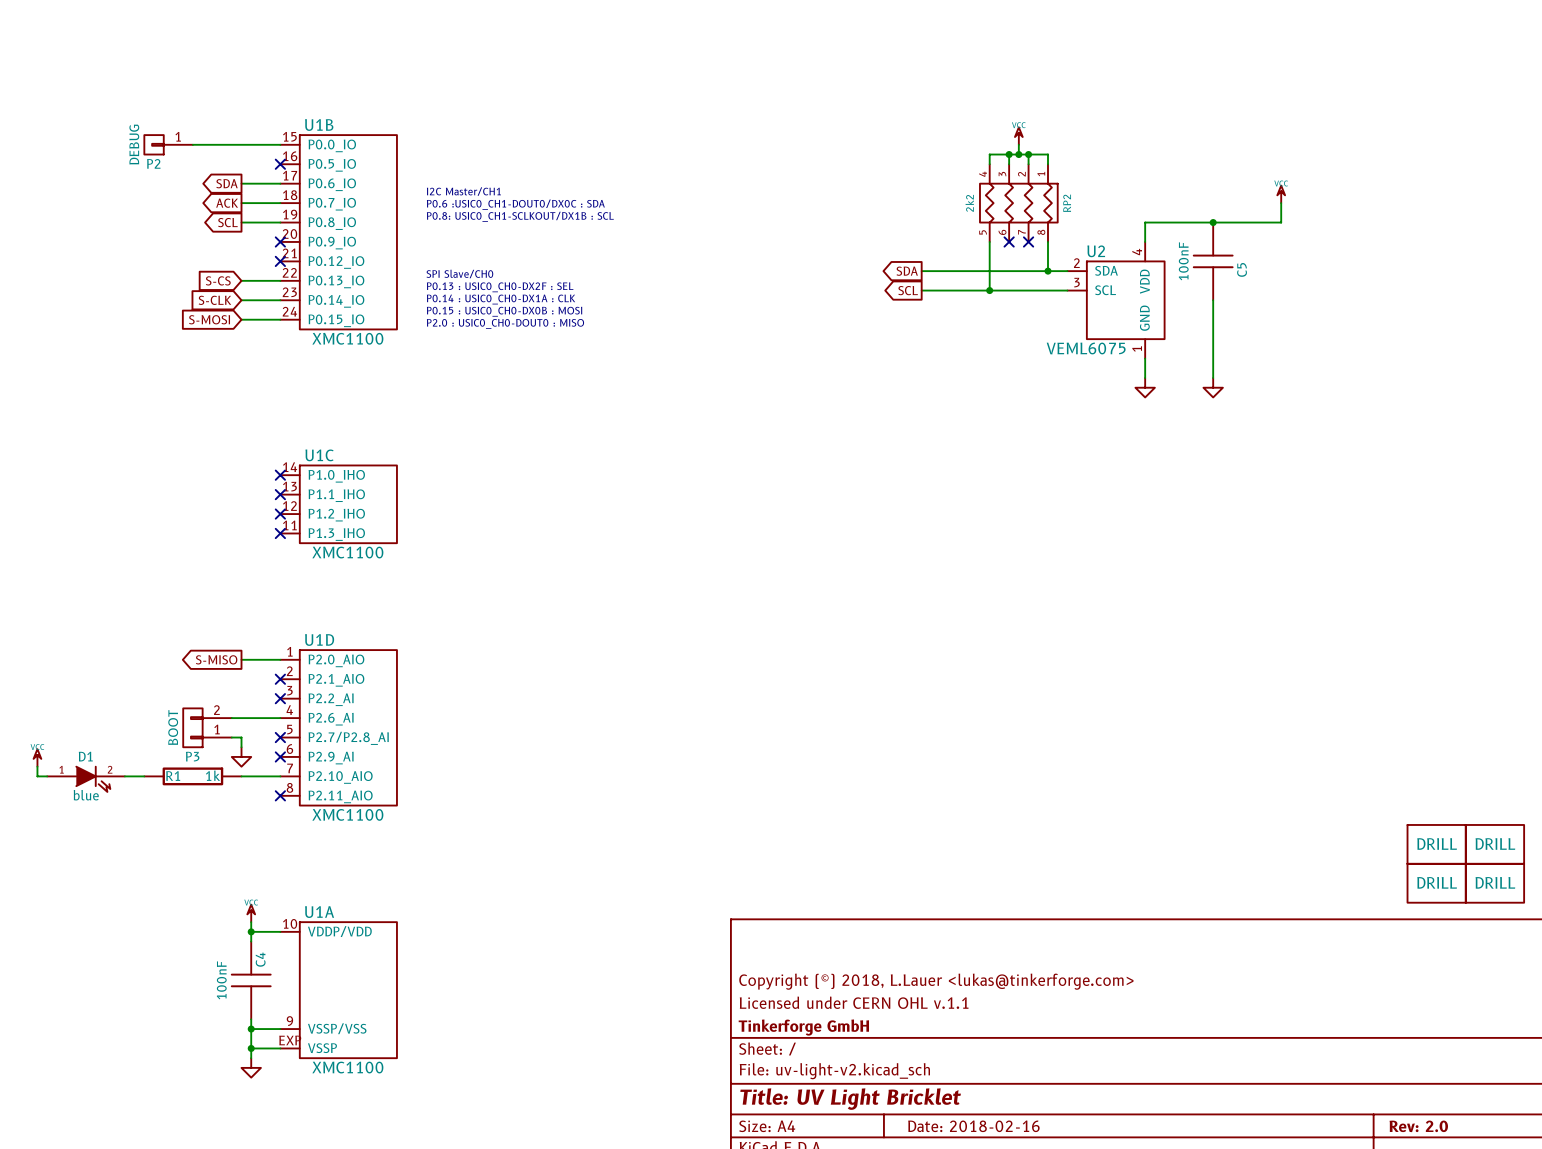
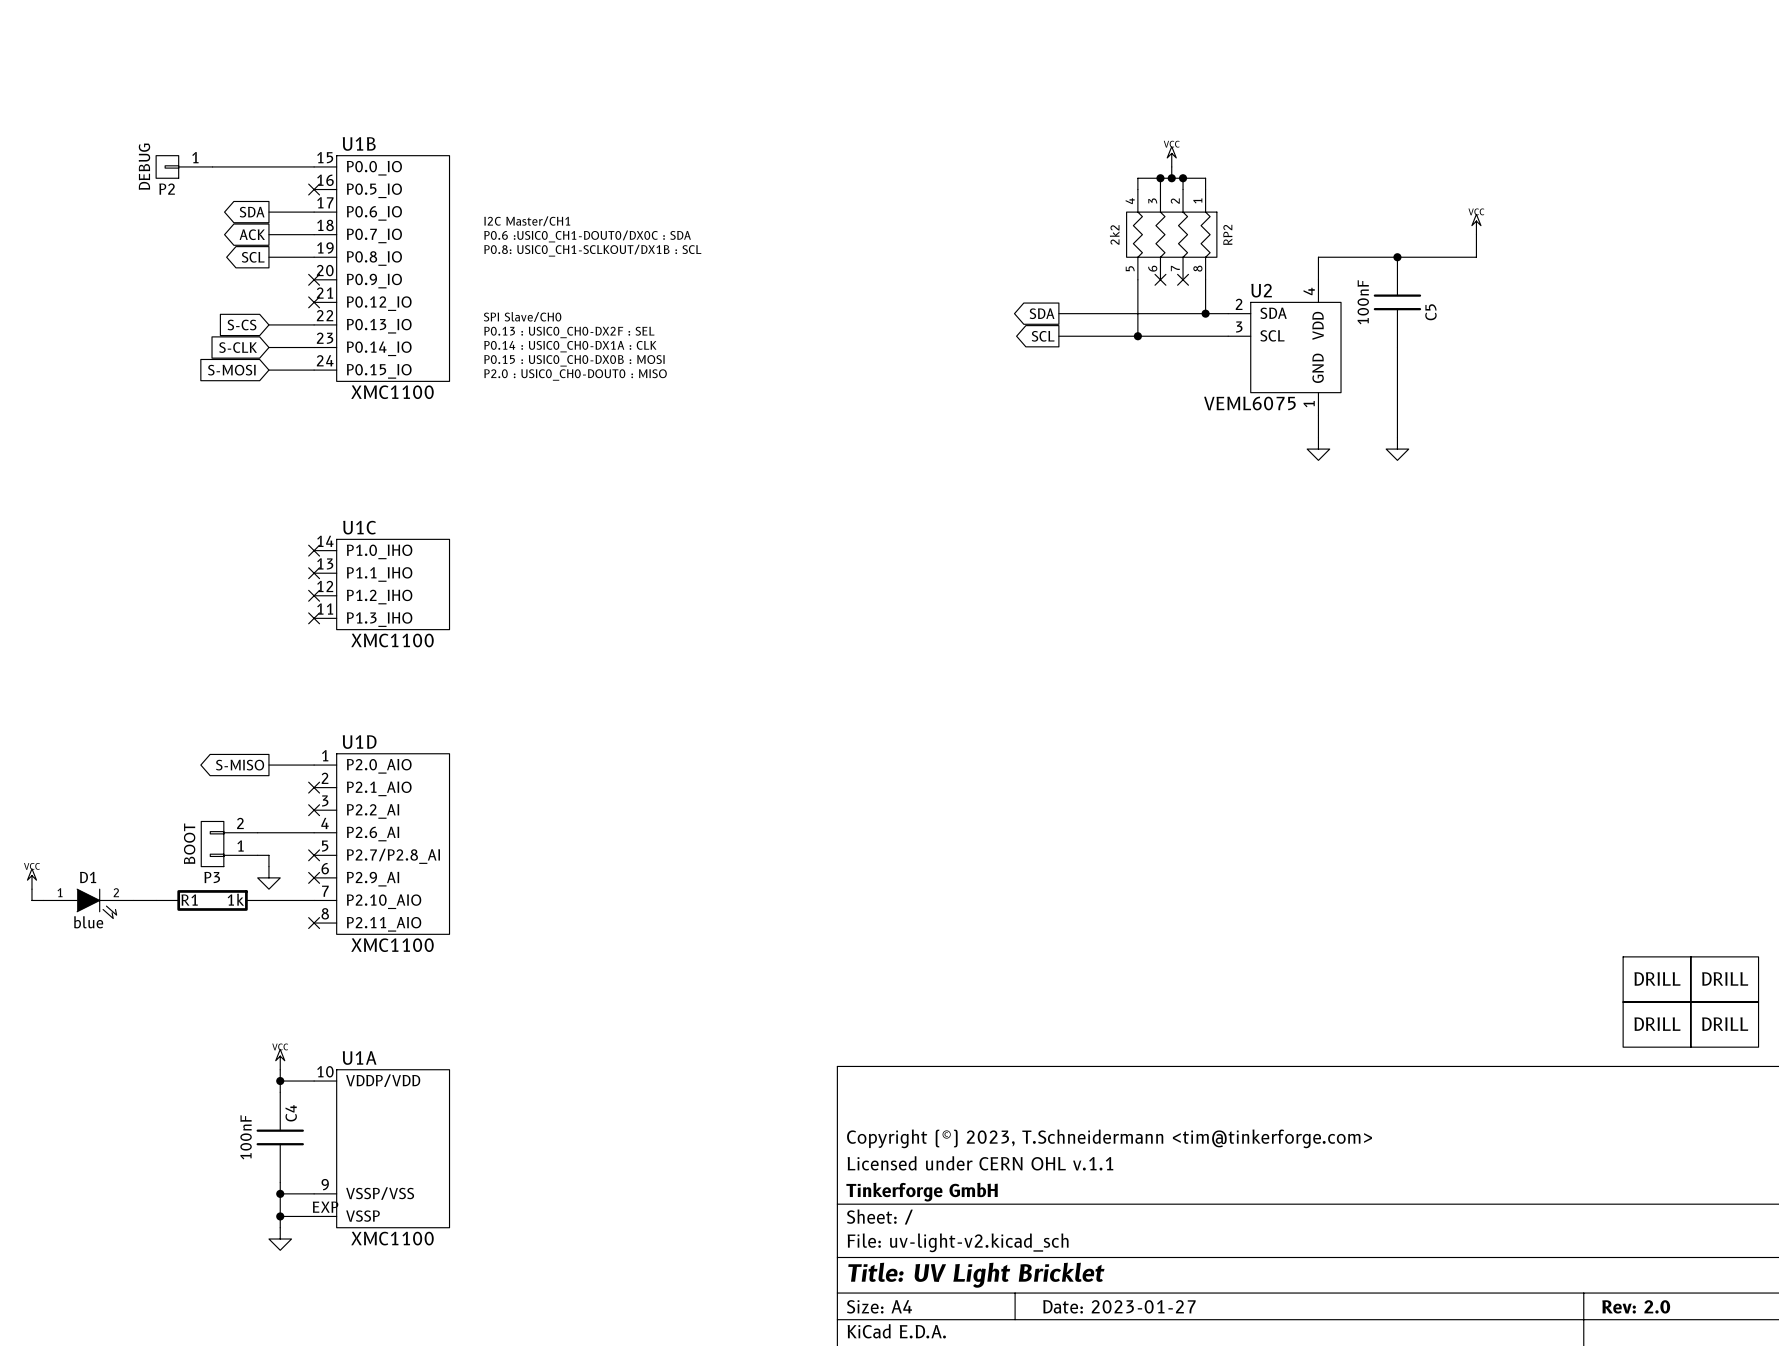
title block: Copyright (©) 2018, L.Lauer <lukas@tinkerforge.com> (936, 981) -> Copyright (©) 2023, T.Schneidermann <tim@tinkerforge.com> (1109, 1138)
title block: Date: 2018-02-16 (973, 1126) -> Date: 2023-01-27 (1119, 1306)

